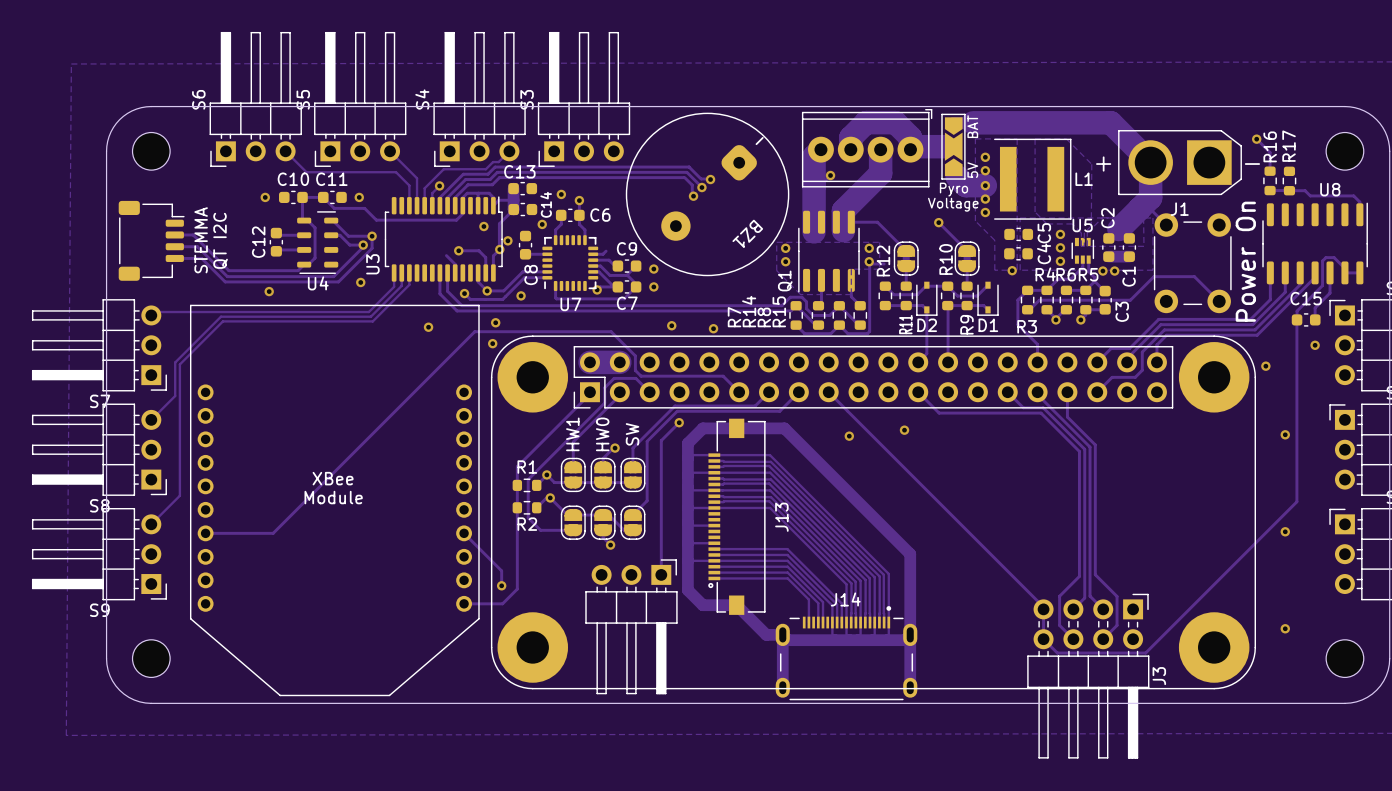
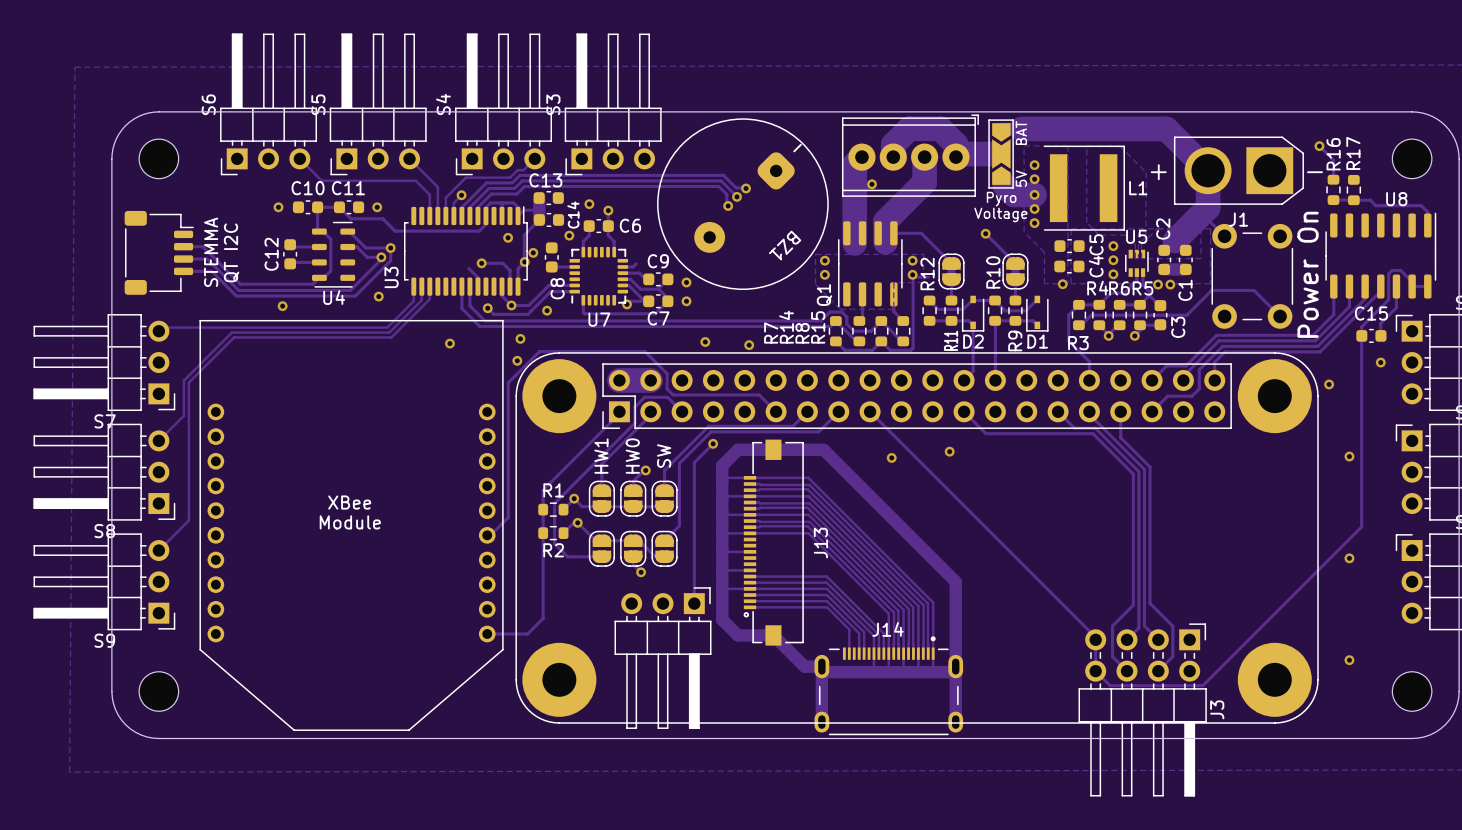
track: (614, 334) (611, 331) (474, 331) (273, 533) (205, 533) -> (644, 351) (539, 351) (508, 382) (508, 517) (490, 535) (487, 535)
track: (464, 533) (501, 570) (501, 585) -> none
via: (501, 585) -> none

